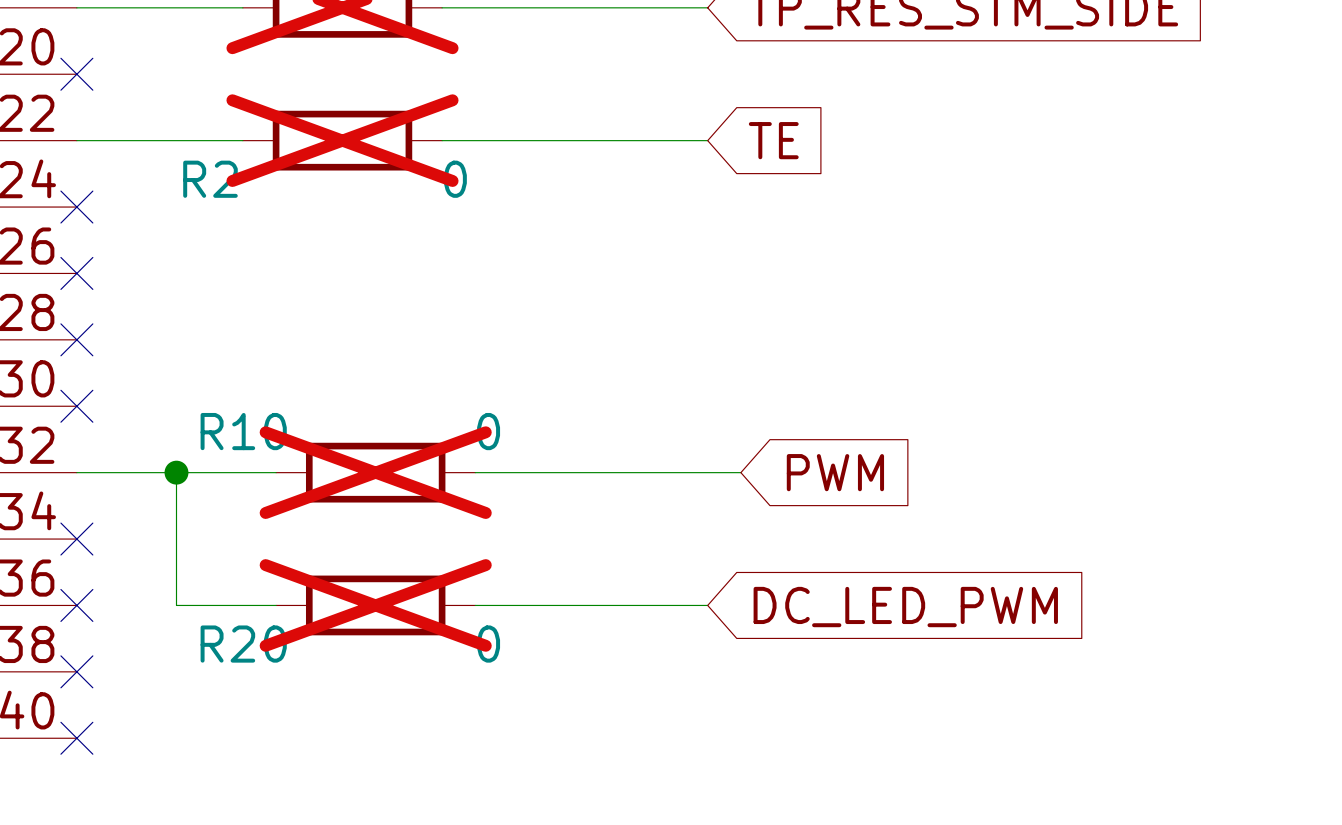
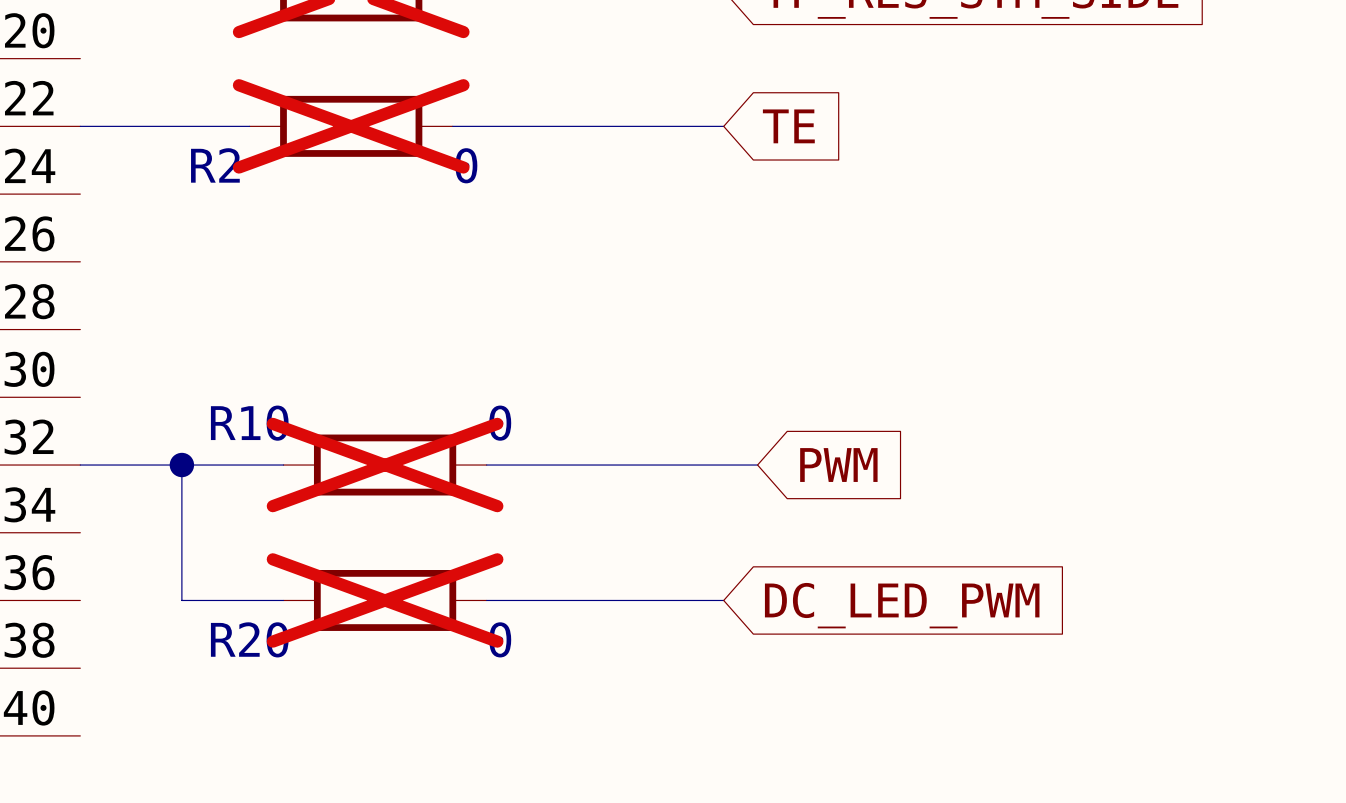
no-connect mark: (76, 74) -> none
no-connect mark: (76, 207) -> none
no-connect mark: (76, 273) -> none
no-connect mark: (76, 339) -> none
no-connect mark: (76, 406) -> none
no-connect mark: (76, 539) -> none
no-connect mark: (76, 605) -> none
no-connect mark: (76, 671) -> none
no-connect mark: (76, 738) -> none

